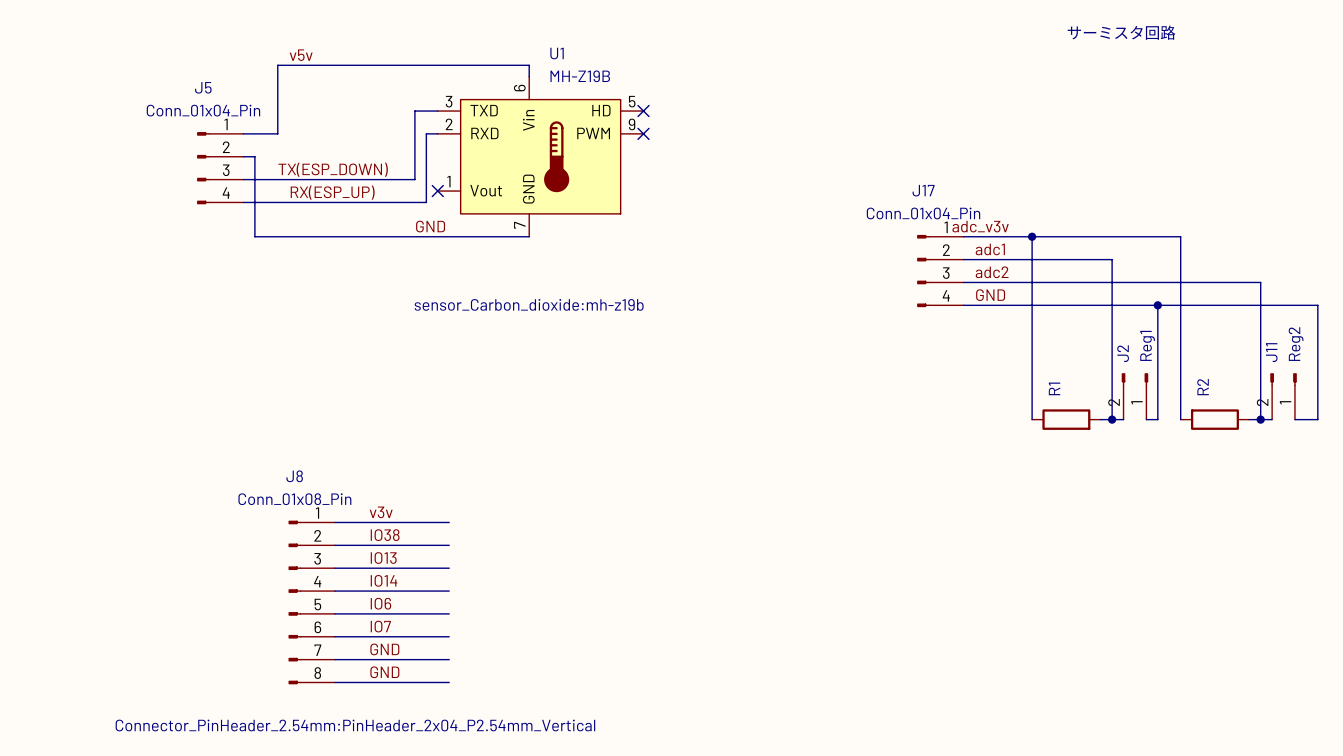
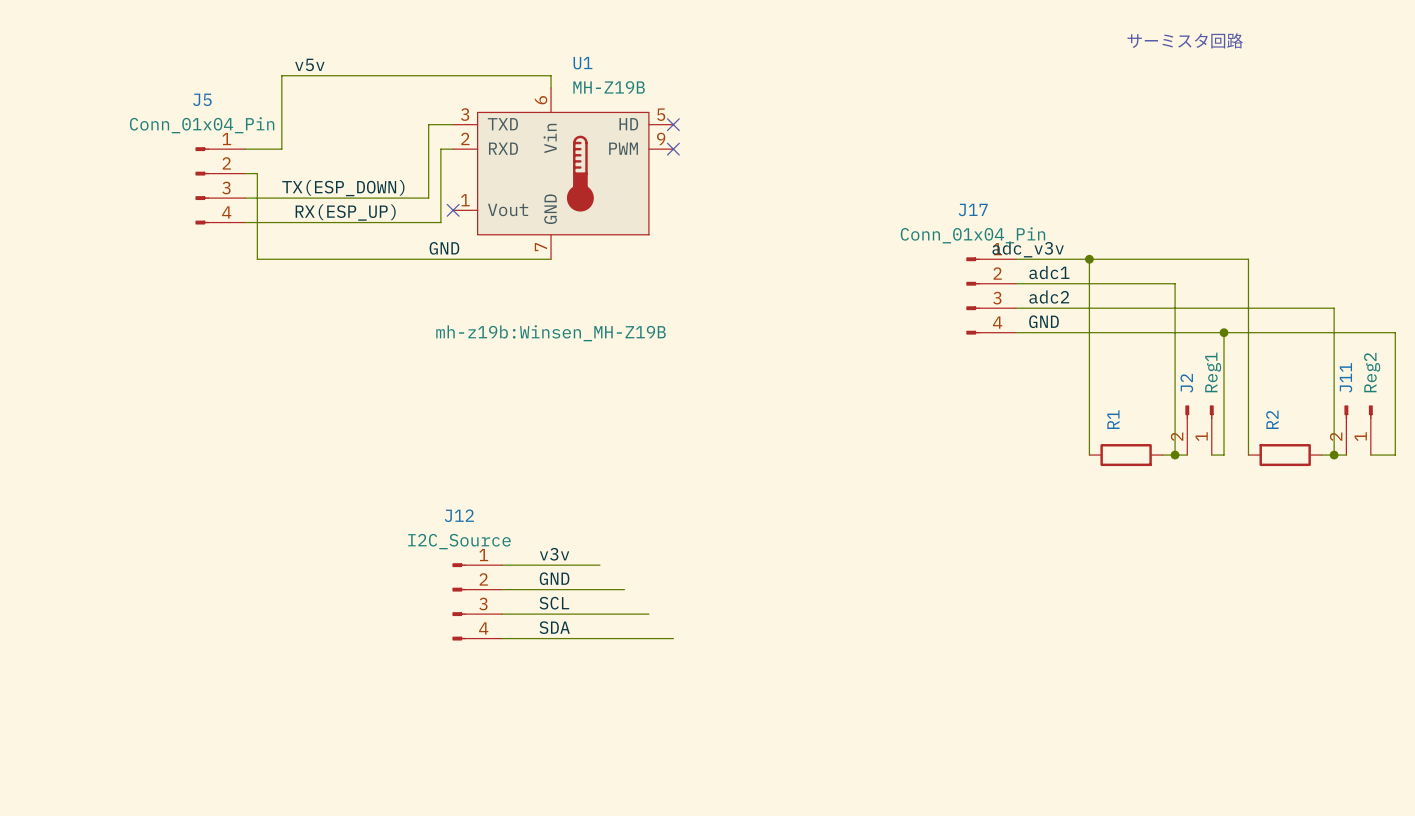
U1 text: sensor_Carbon_dioxide:mh-z19b (529, 304) -> mh-z19b:Winsen_MH-Z19B (551, 333)
label position: v3v (381, 512) -> v3v (554, 554)
wire: (334, 522) (449, 522) -> none
wire: none -> (502, 565) (599, 565)
label: IO38 (385, 535) -> none
label: none -> GND (554, 578)
wire: (334, 545) (449, 545) -> (502, 589) (624, 589)
J12: none -> I2C_Source (477, 601)
label: IO13 (383, 558) -> none
label: none -> SCL (554, 603)
wire: (334, 568) (449, 568) -> none
wire: none -> (502, 614) (648, 614)
label: IO14 (384, 580) -> none
label: none -> SDA (554, 627)
wire: (334, 591) (449, 591) -> none
wire: none -> (502, 638) (673, 638)
J8: Conn_01x08_Pin (311, 602) -> none
label: IO6 (380, 603) -> none
wire: (334, 613) (449, 613) -> none
label: IO7 (380, 626) -> none
wire: (334, 636) (449, 636) -> none
label: GND (384, 649) -> none
wire: (334, 659) (449, 659) -> none
label: GND (384, 672) -> none
wire: (334, 682) (449, 682) -> none

